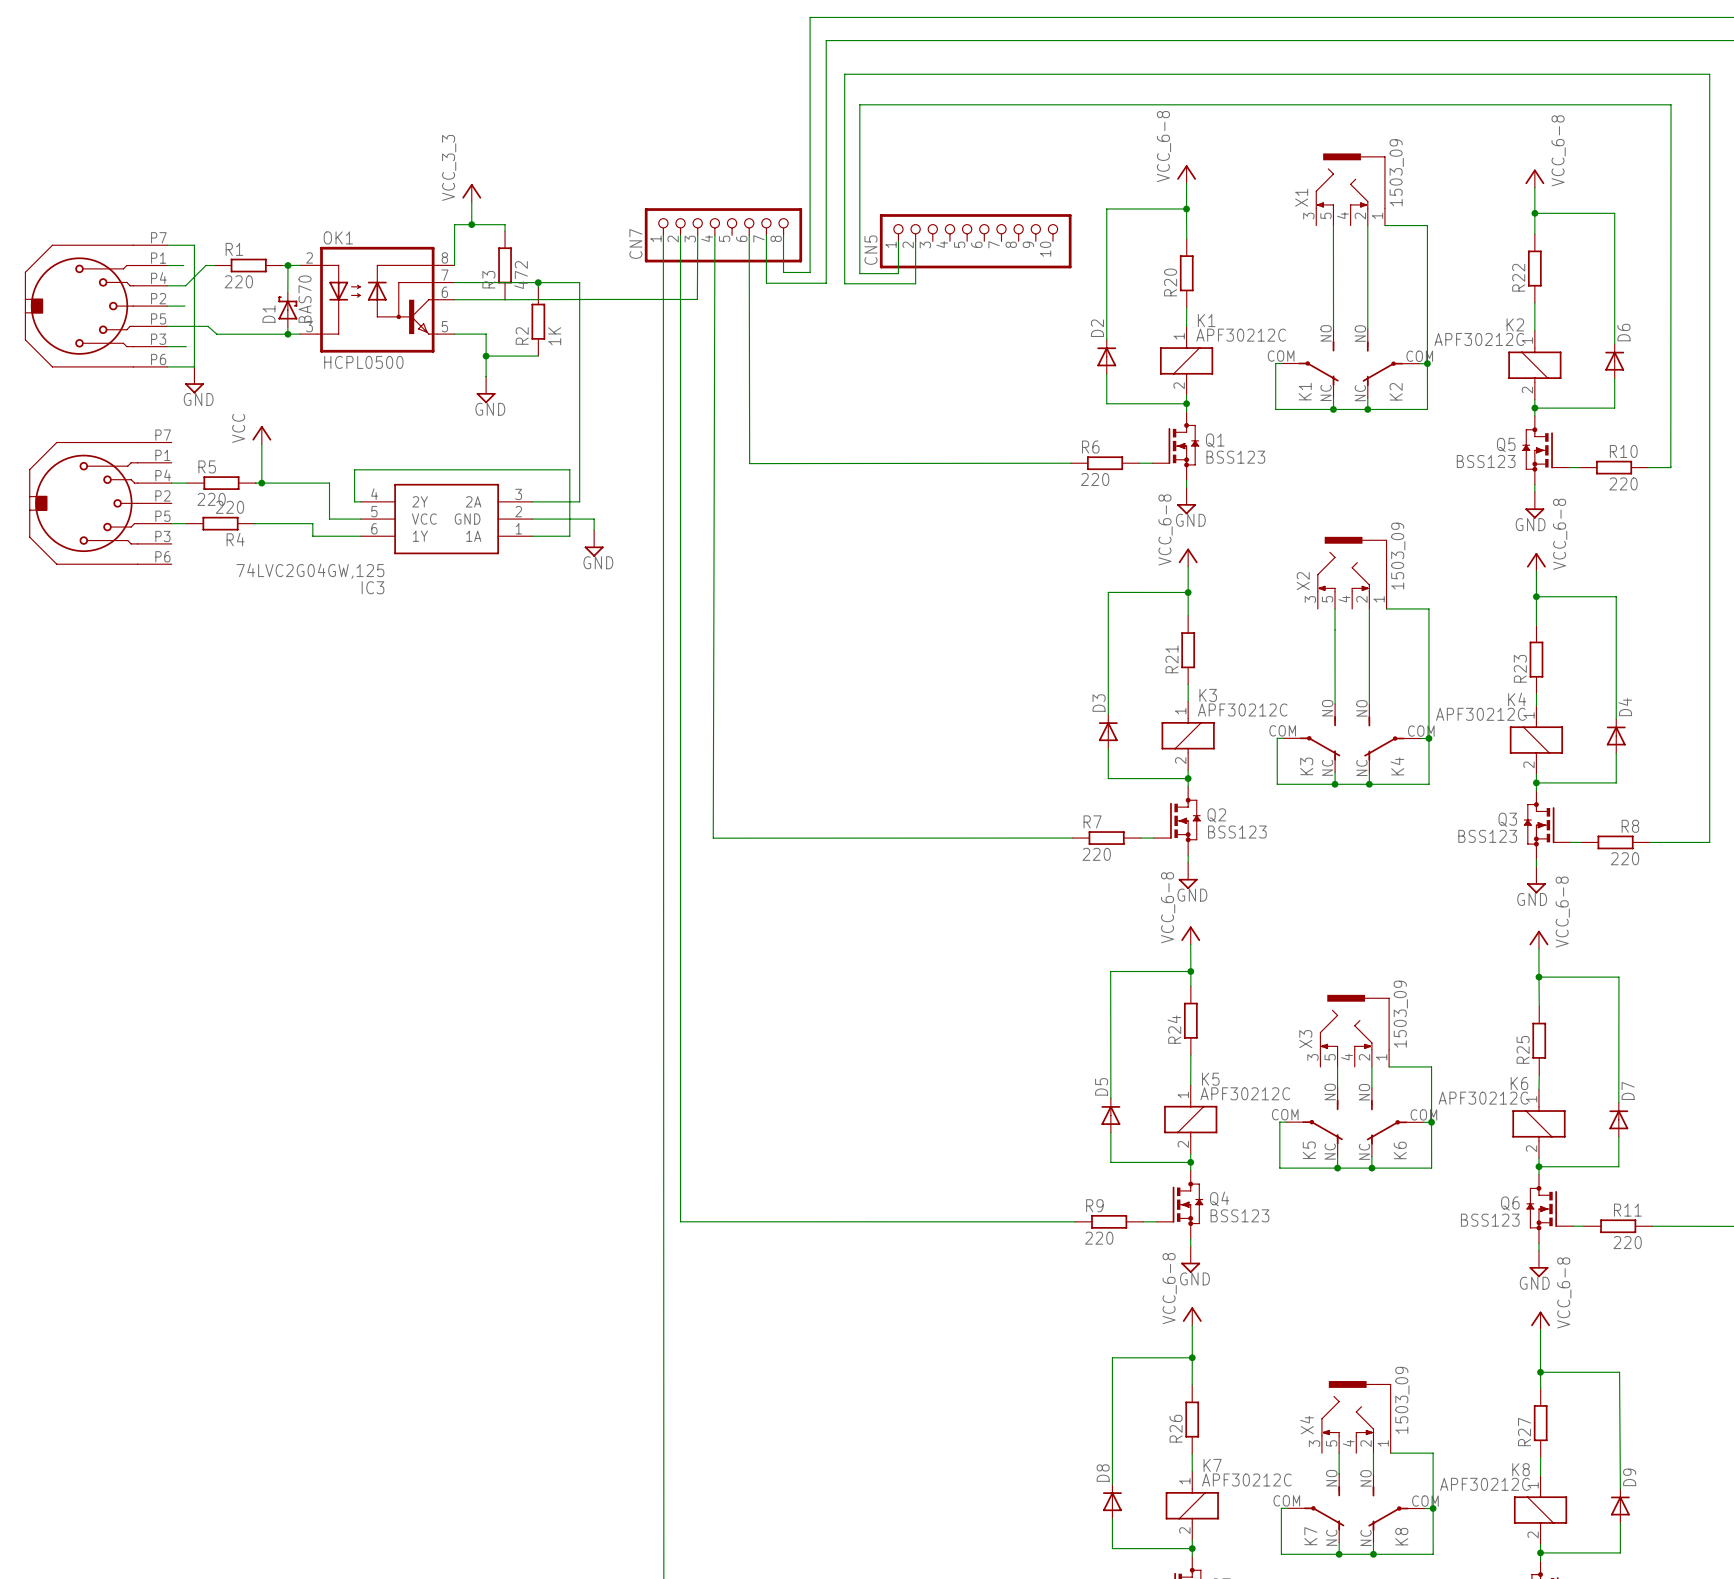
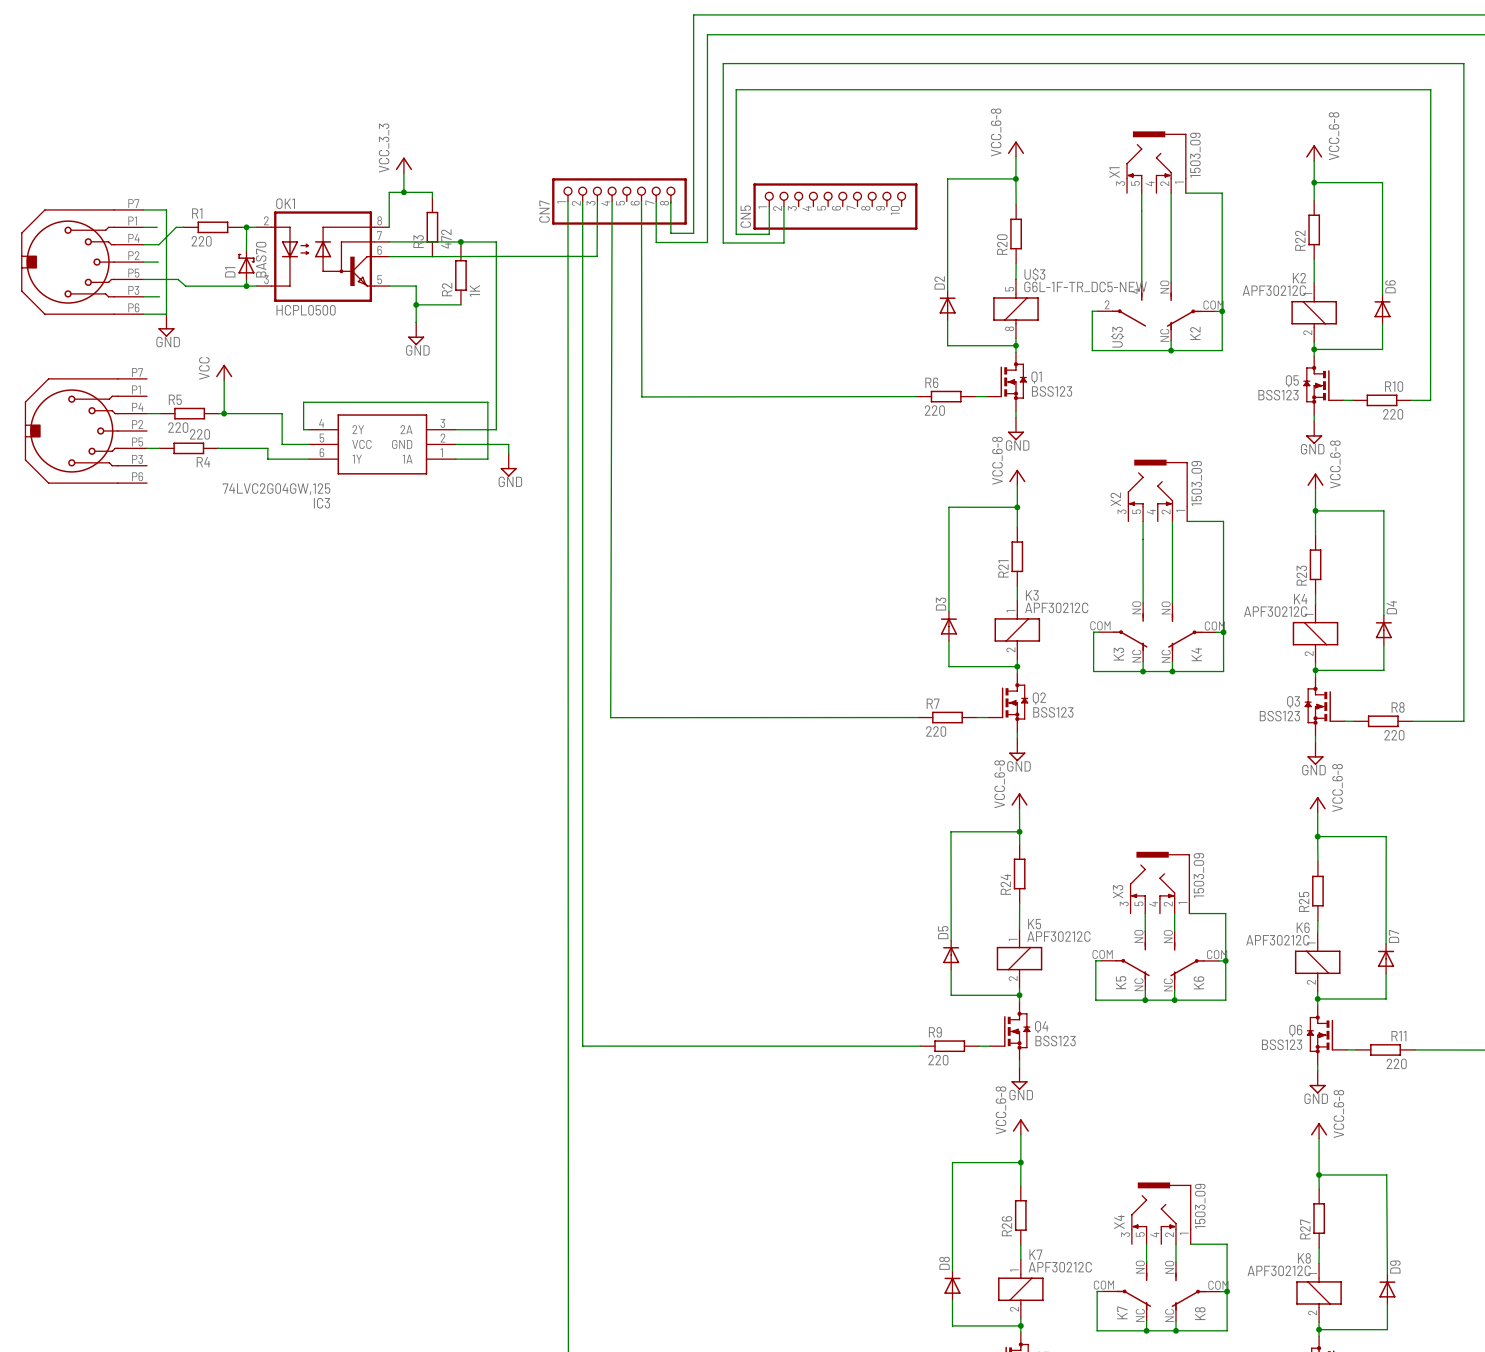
K1 name: K1 (1206, 320) -> U$3 (1034, 274)
K1 value: APF30212C (1241, 335) -> G6L-1F-TR_DC5-NEW (1085, 286)
K1 pin number: 1 (1179, 336) -> 5 (1009, 289)
U$3: none -> (1121, 304)
K1: (1310, 363) -> none
K1 pin number: 2 (1179, 385) -> 8 (1009, 328)
wire: (1333, 397) (1333, 409) -> none
junction: (1333, 409) -> none

